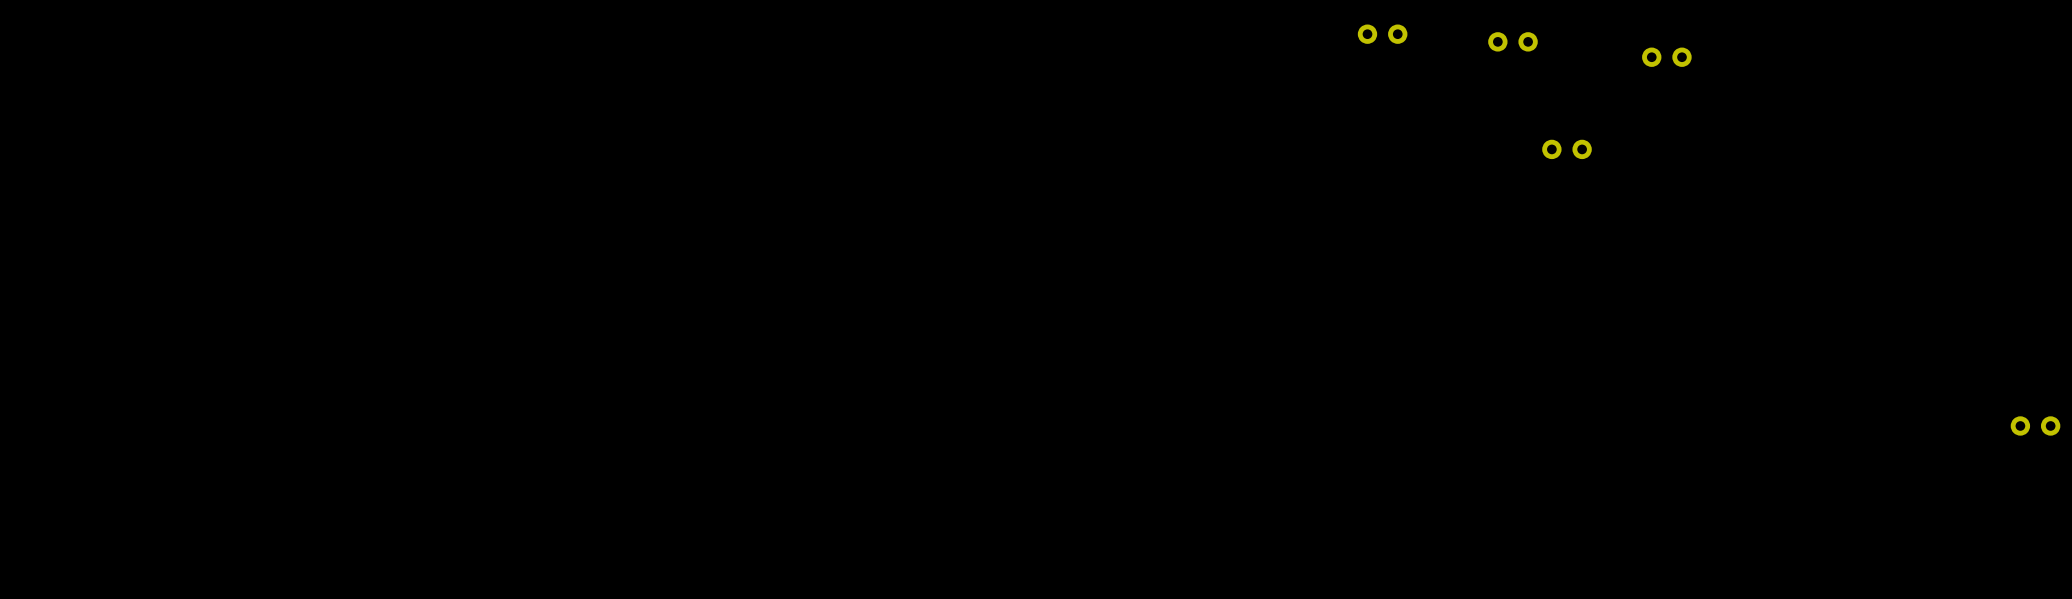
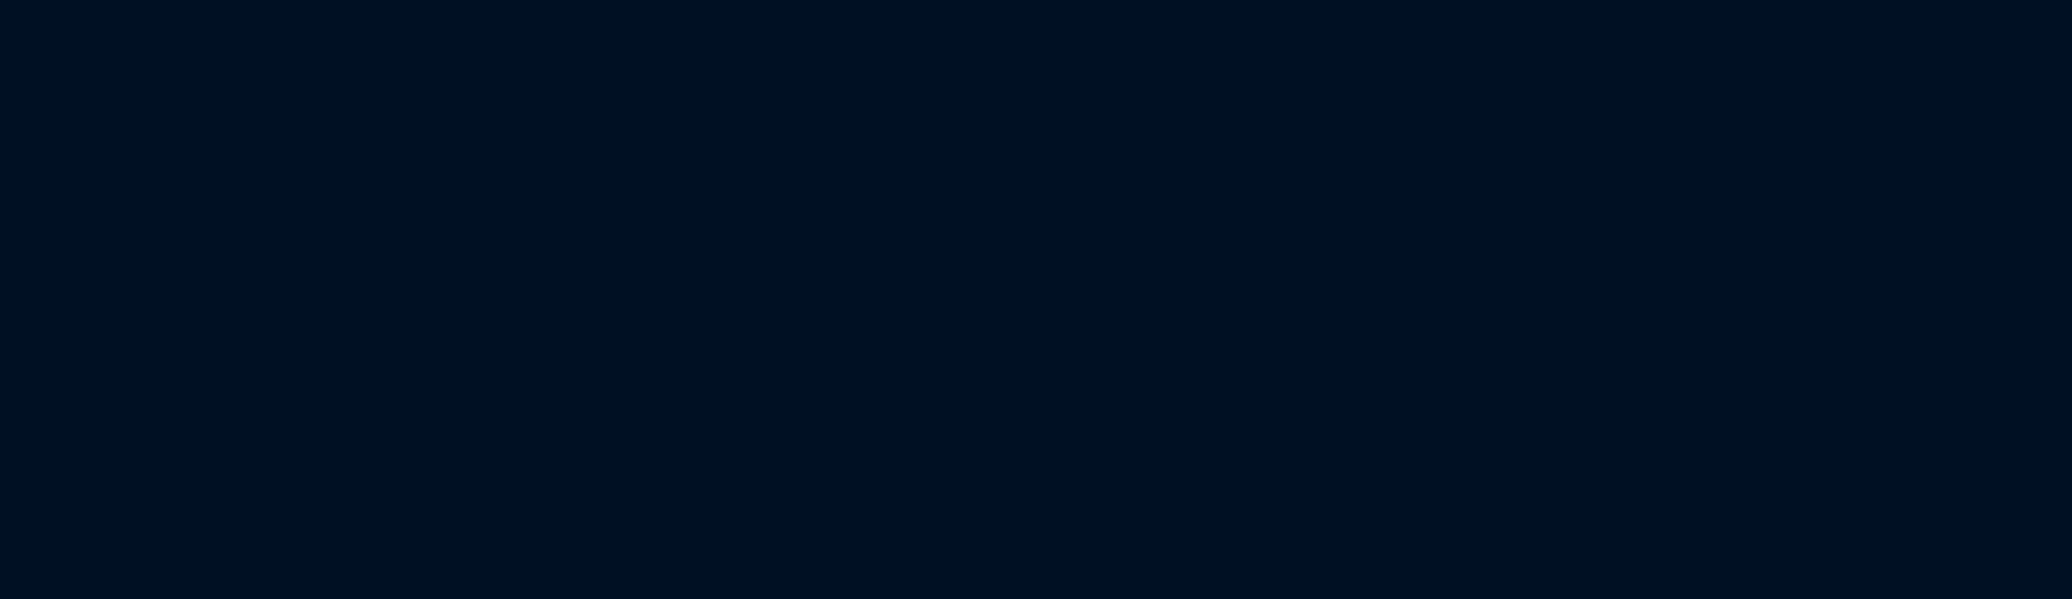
part: (1382, 34) -> none
part: (1512, 41) -> none
part: (1666, 57) -> none
part: (1567, 149) -> none
part: (2035, 425) -> none

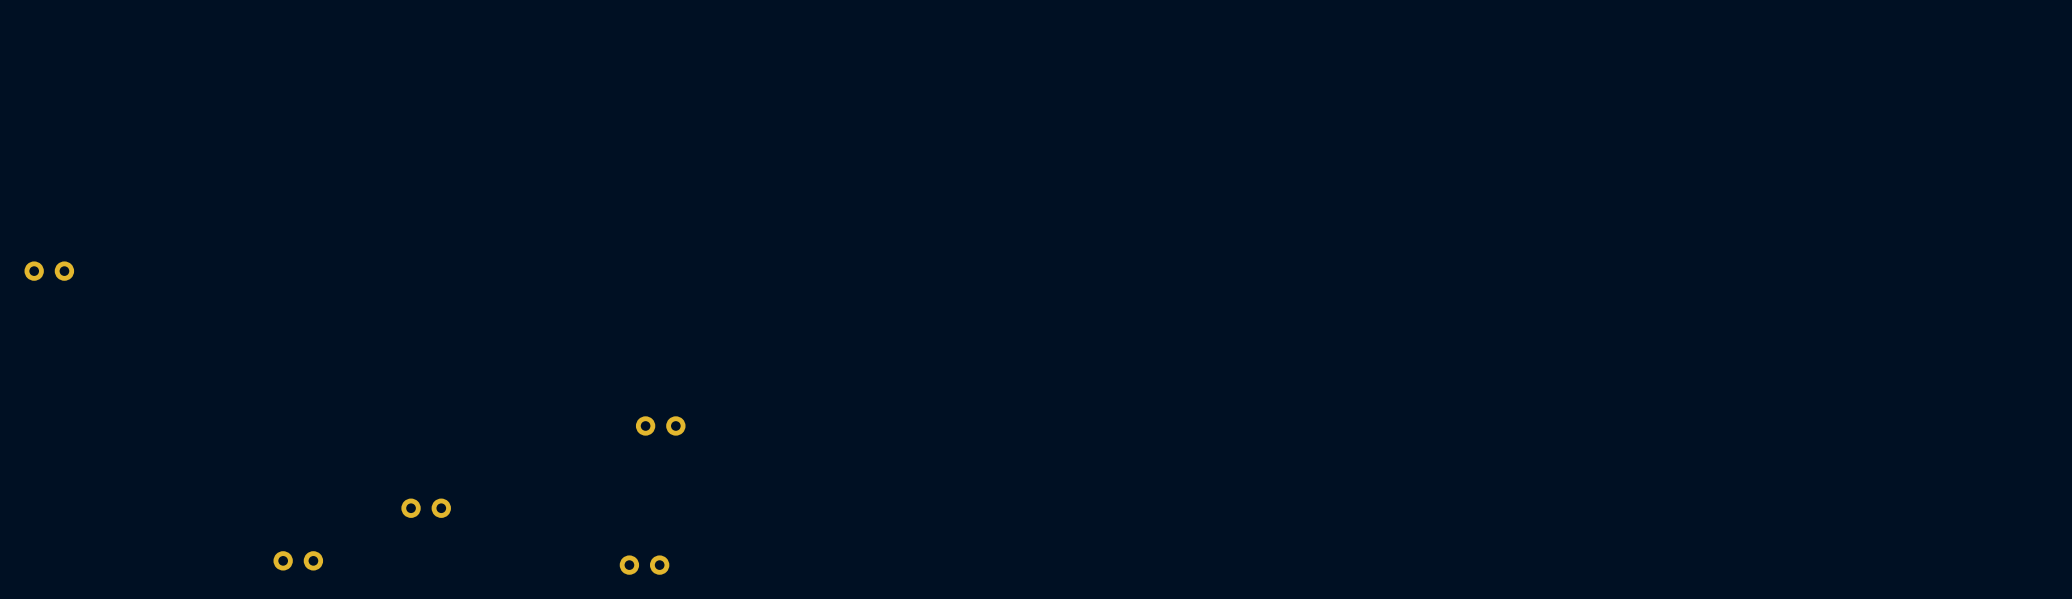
part: none -> (49, 271)
part: none -> (660, 425)
part: none -> (426, 508)
part: none -> (298, 560)
part: none -> (644, 565)

